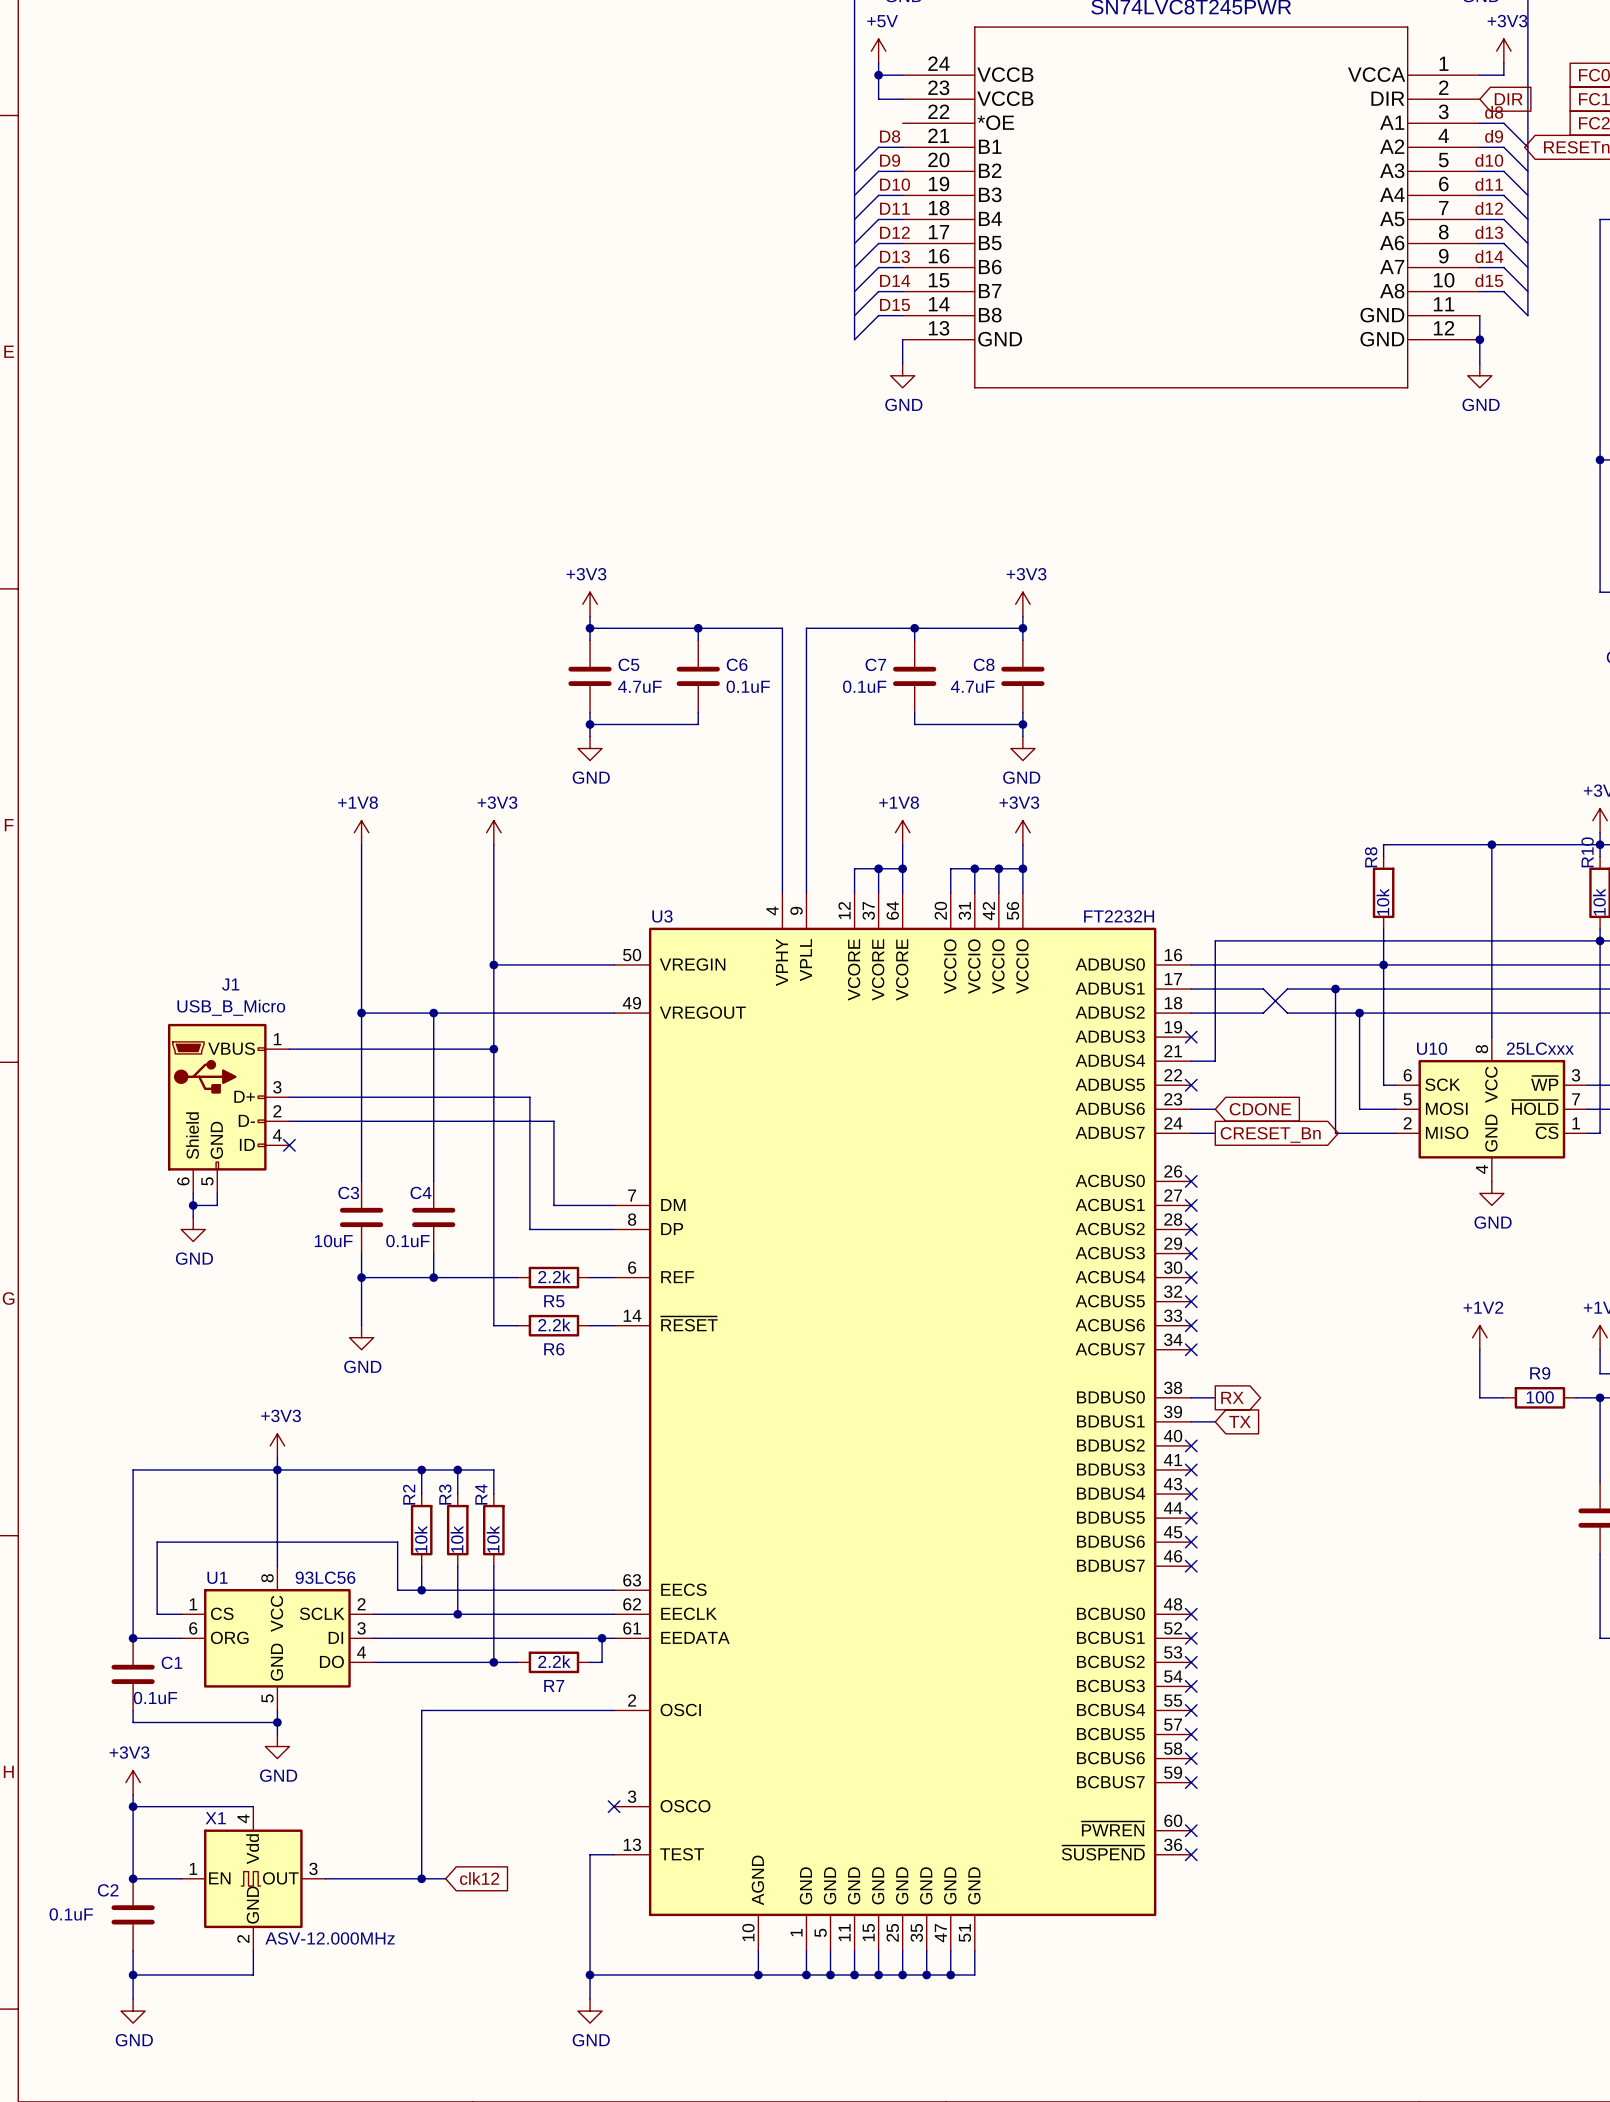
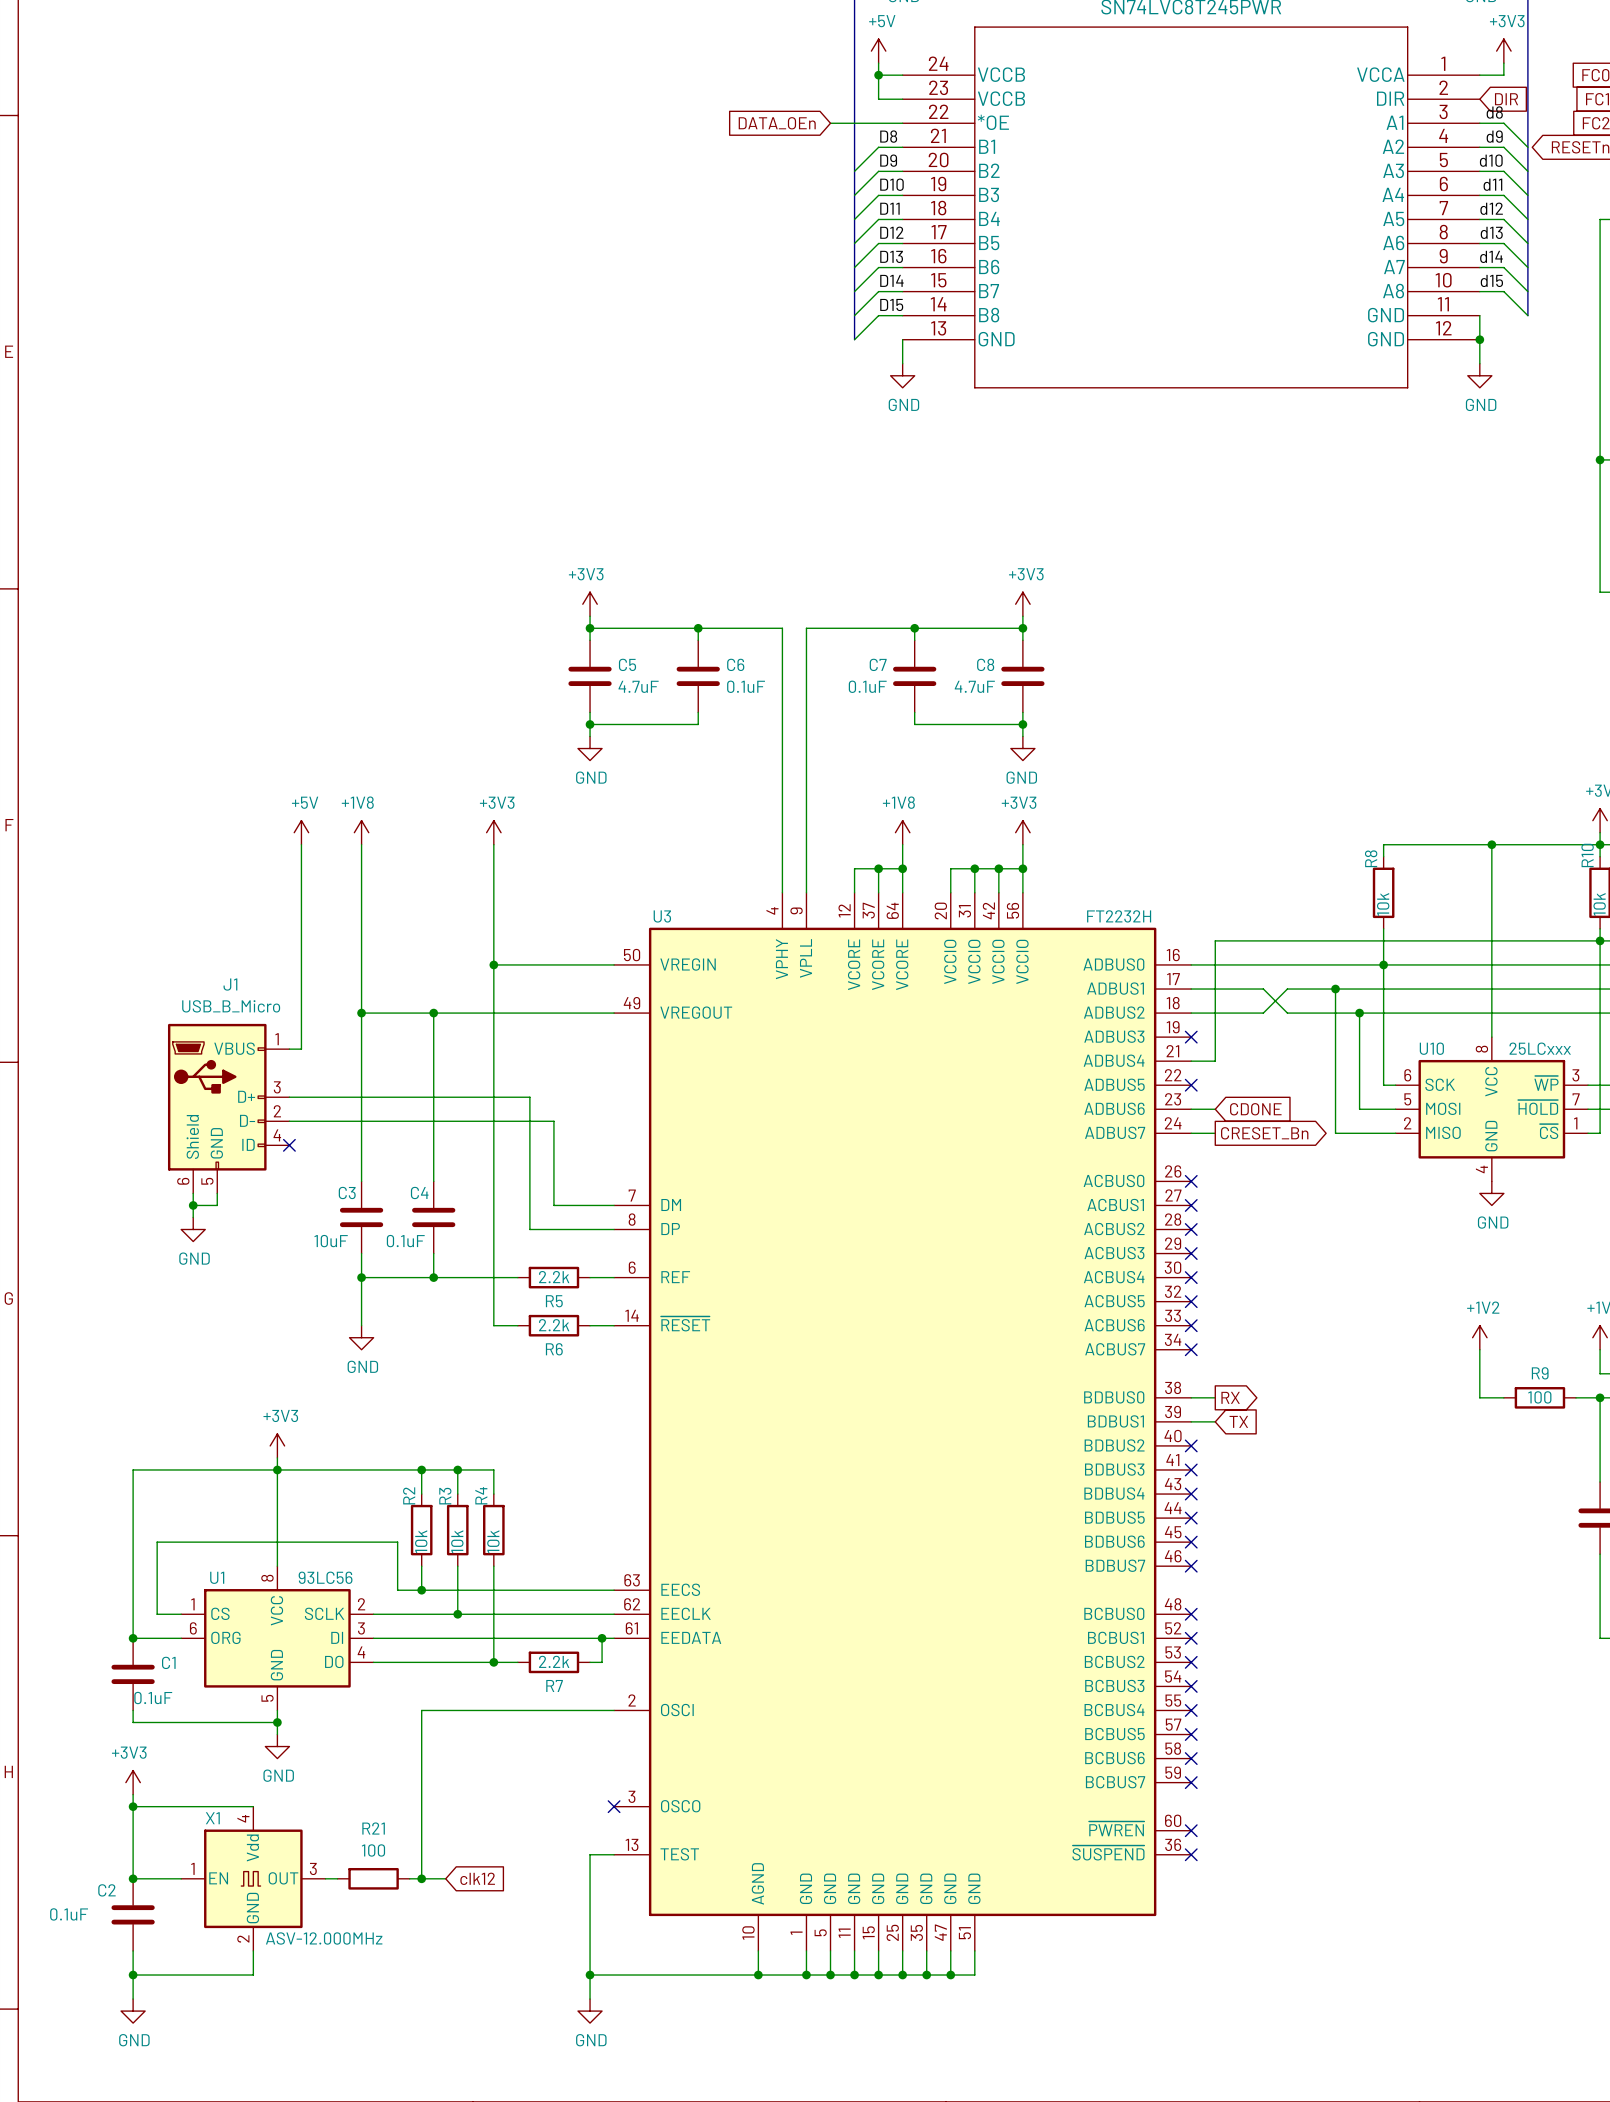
wire: none -> (830, 123) (902, 123)
global label: none -> DATA_OEn (777, 123)
power symbol: none -> +5V (301, 832)
wire: (301, 1049) (493, 1049) -> (301, 1049) (301, 844)
junction: (493, 1049) -> none
wire: (337, 1878) (409, 1878) -> none
R21: none -> 100 (373, 1878)

